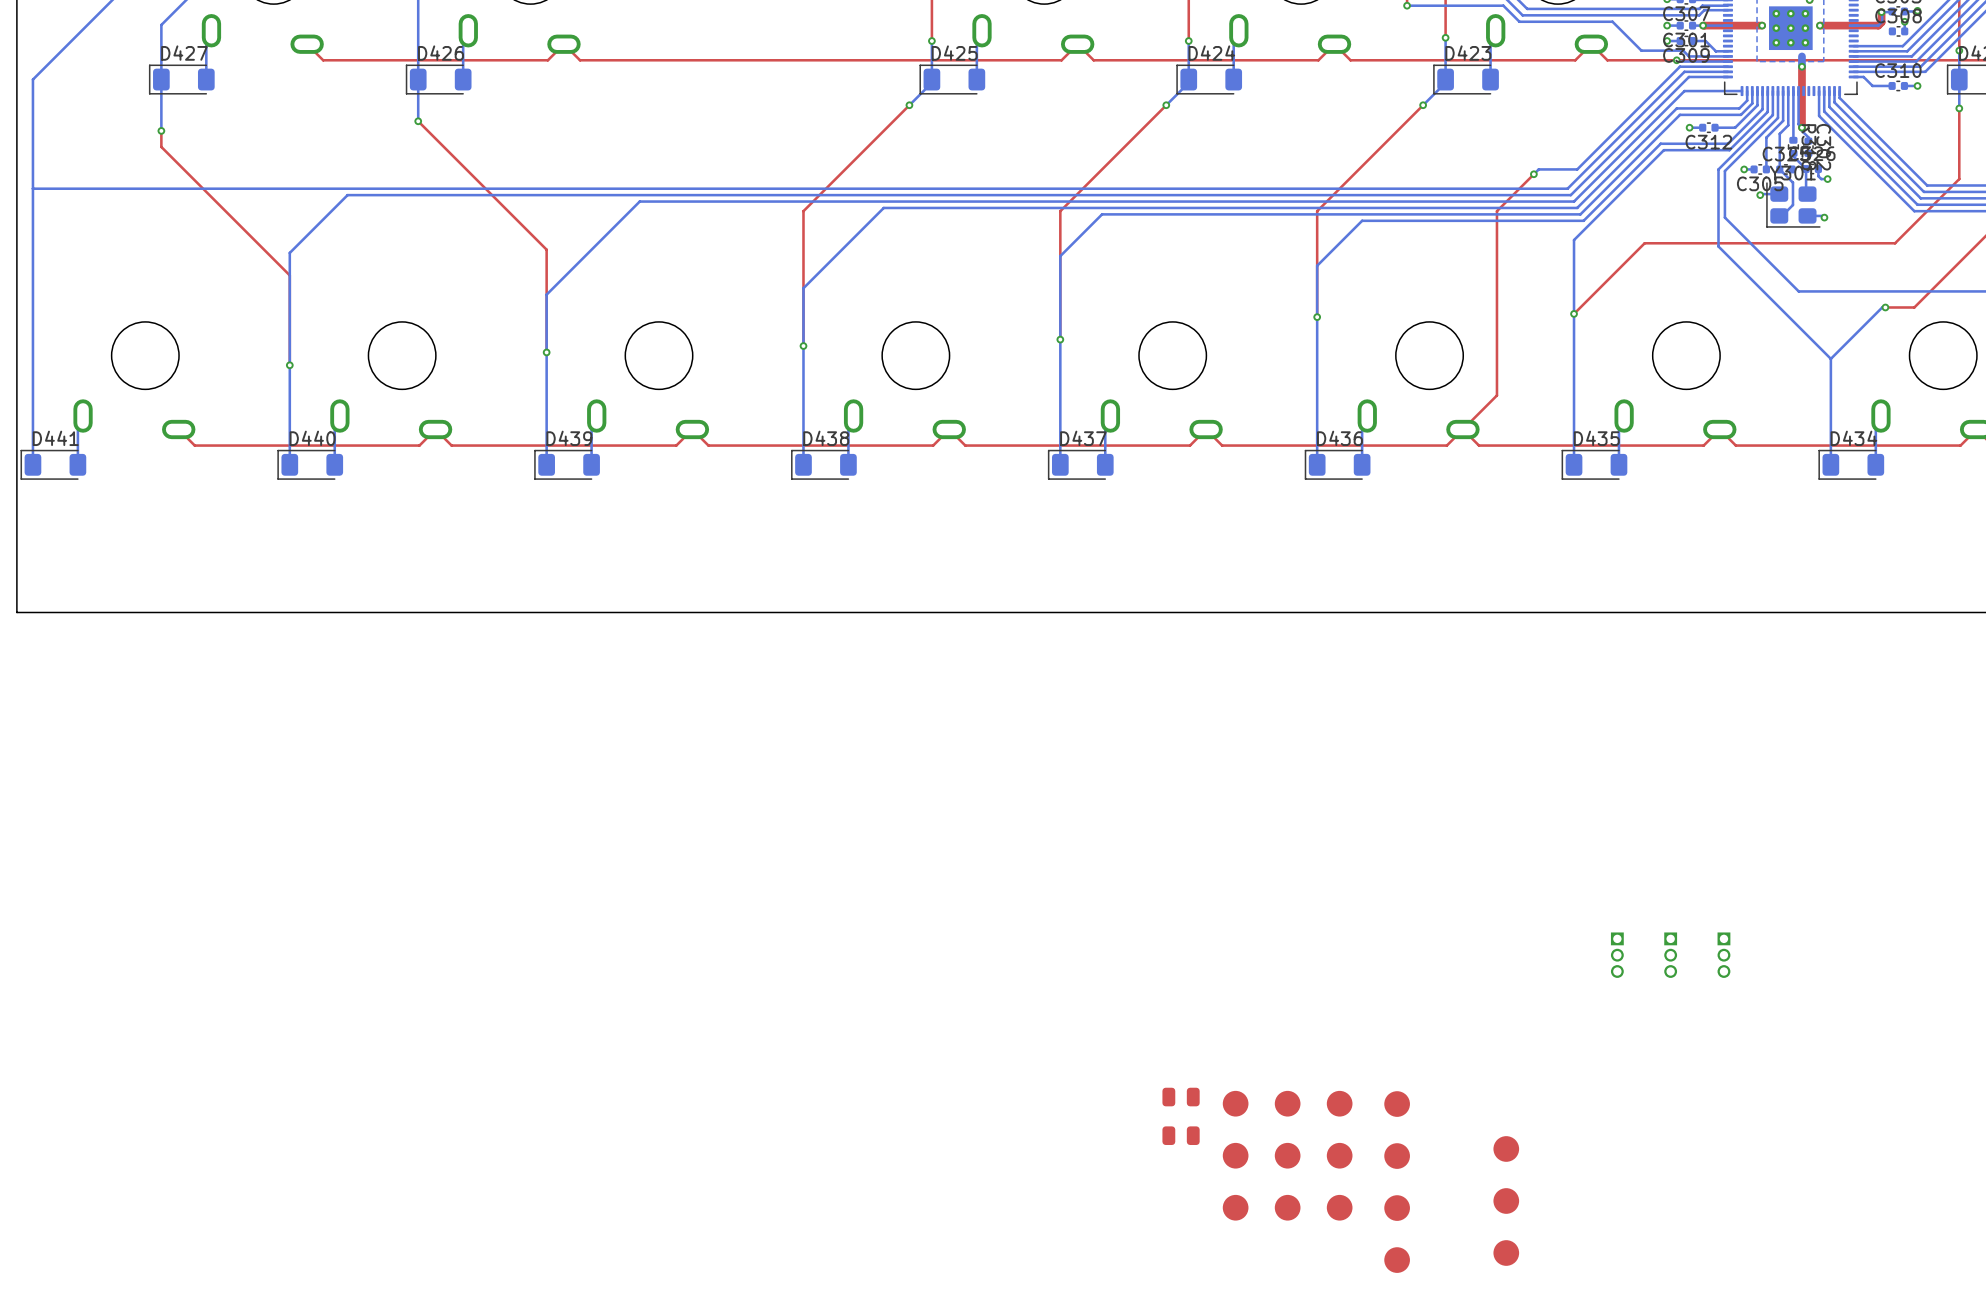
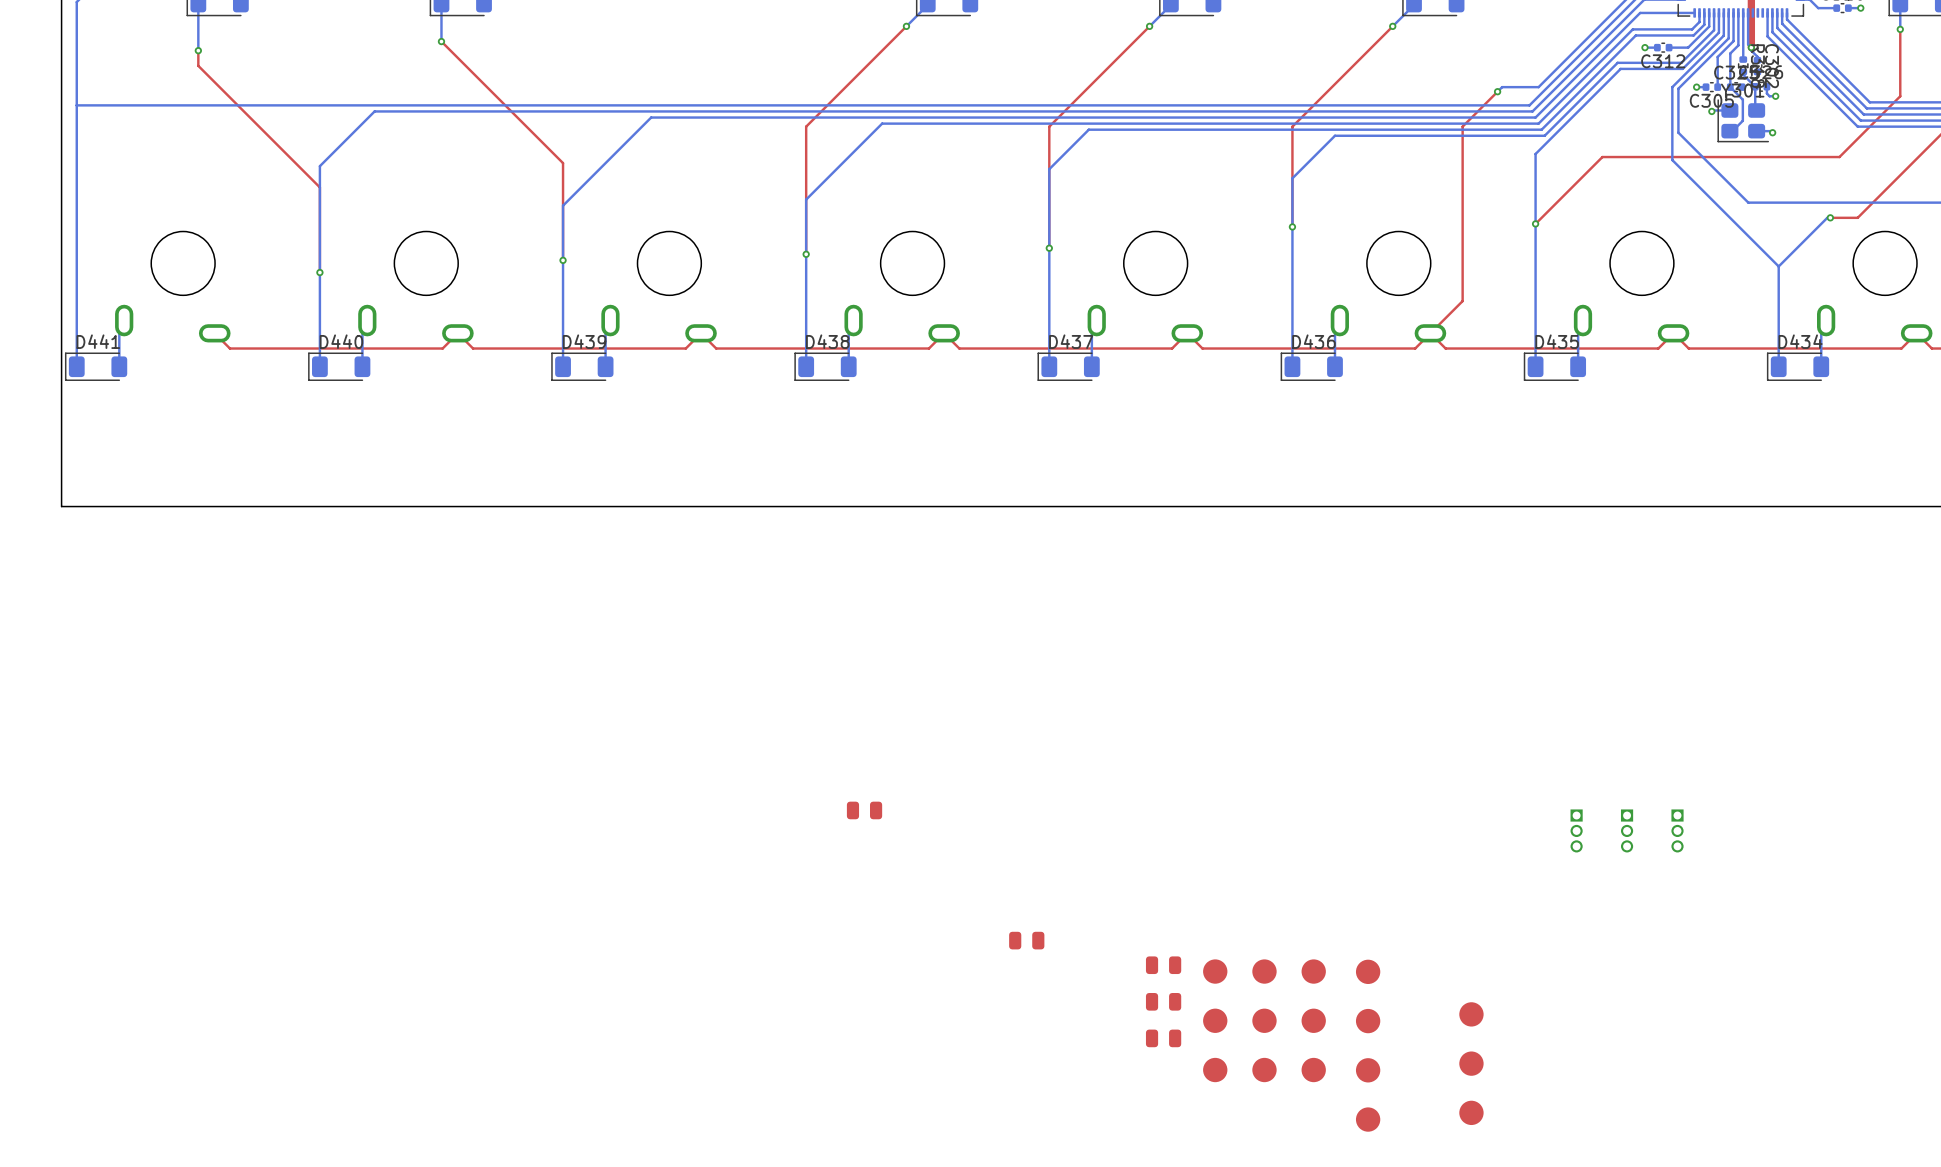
part: none -> (864, 810)
part: none -> (1026, 940)
part: none -> (1163, 1038)

